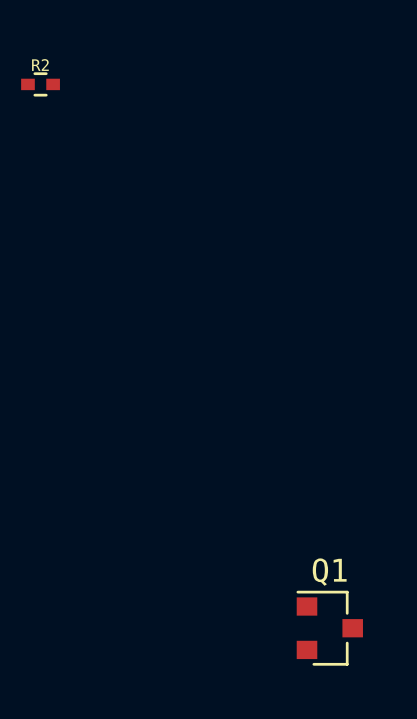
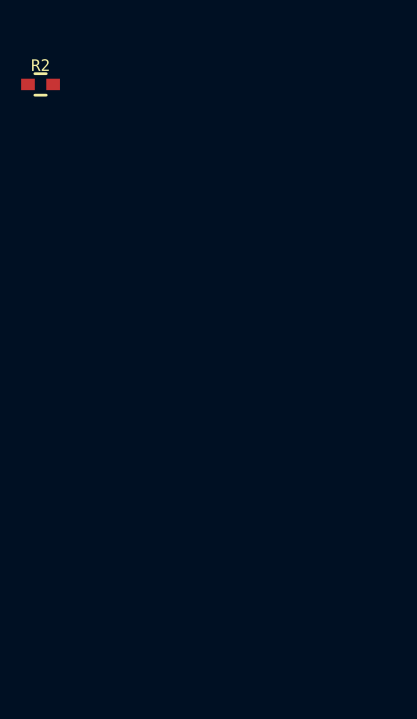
Q1: (329, 628) -> none

